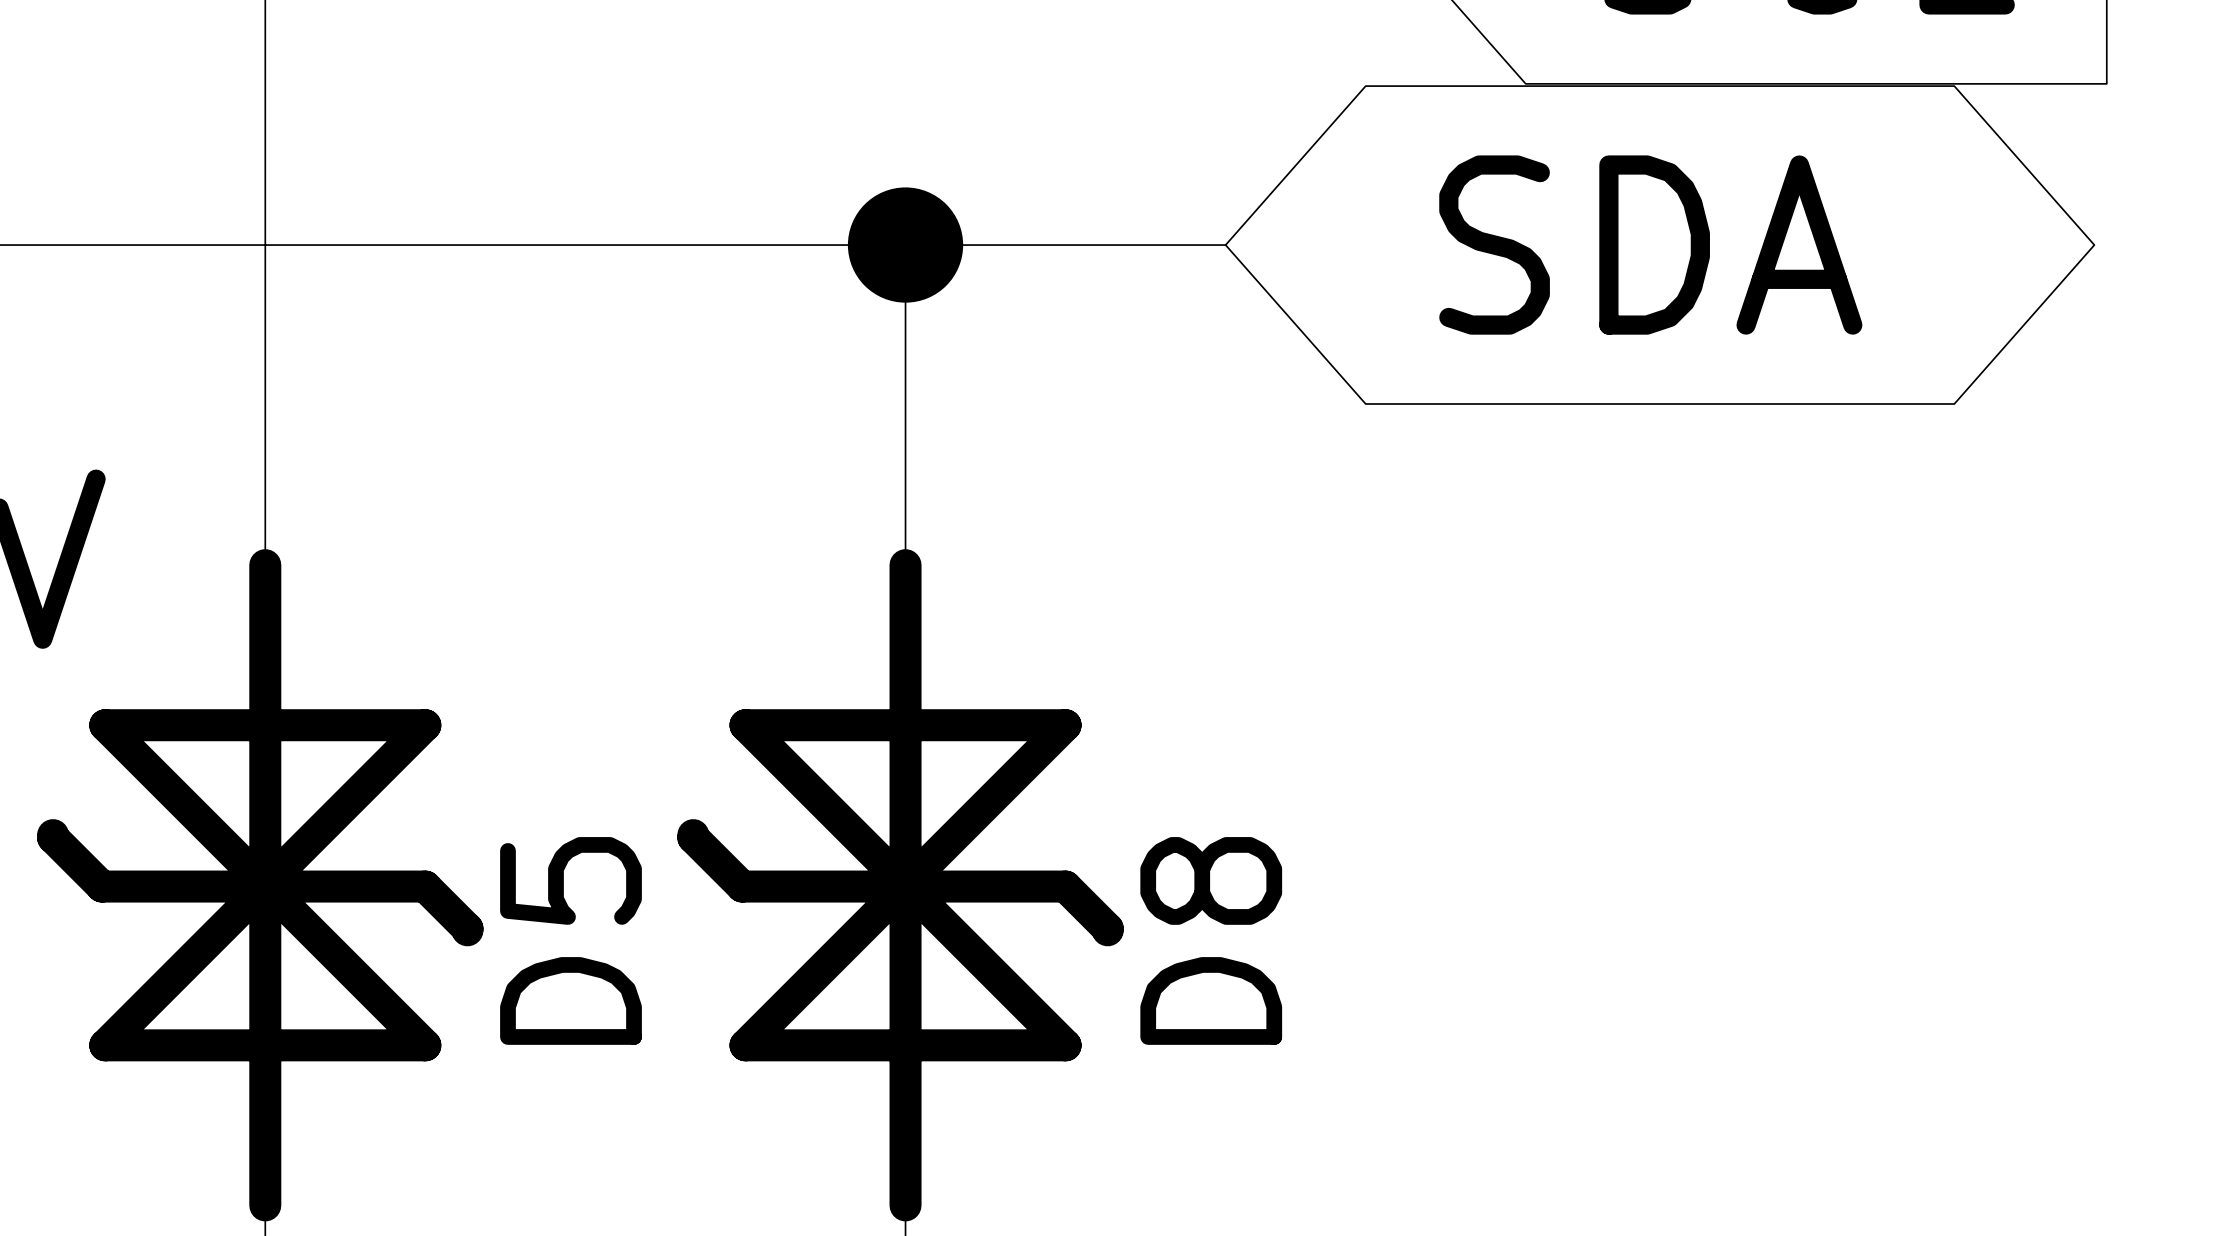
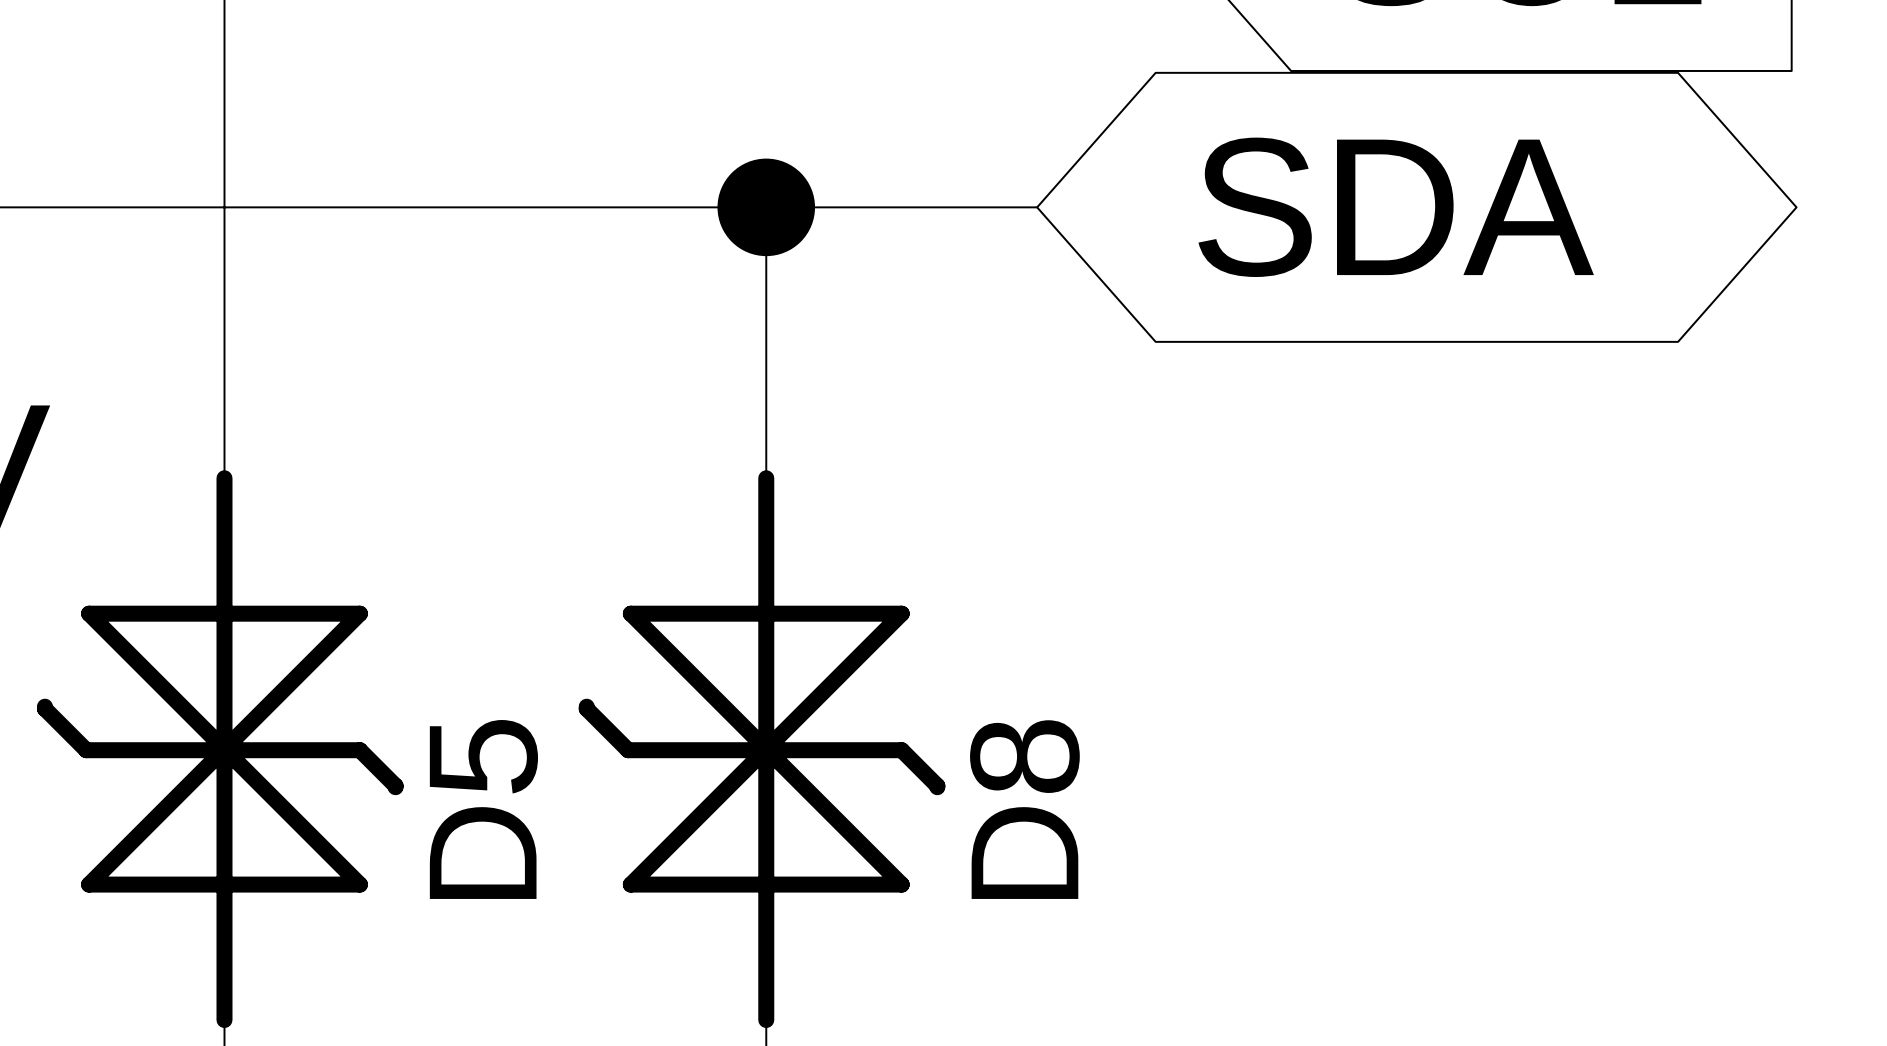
D5 symbol: [37, 549, 484, 1222] -> [36, 470, 404, 1029]
D8 symbol: [677, 549, 1124, 1222] -> [578, 470, 946, 1029]

